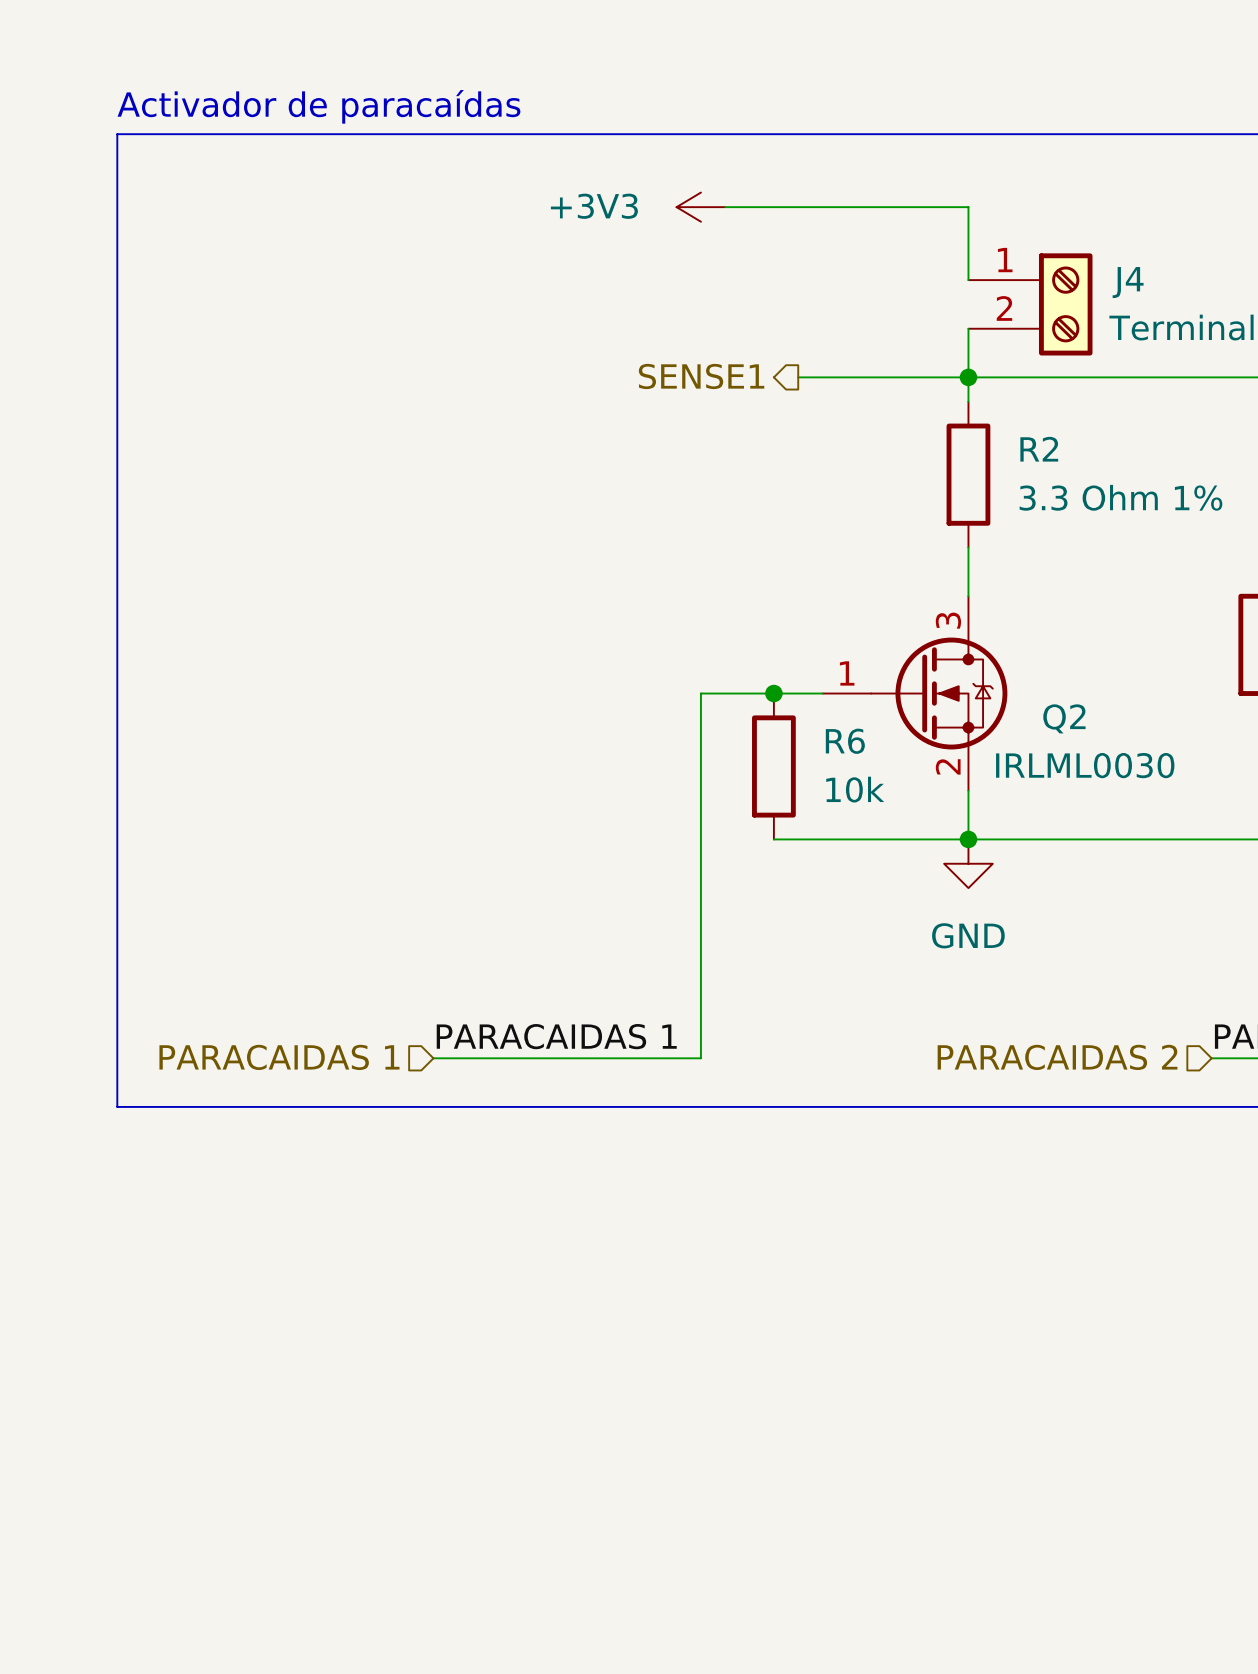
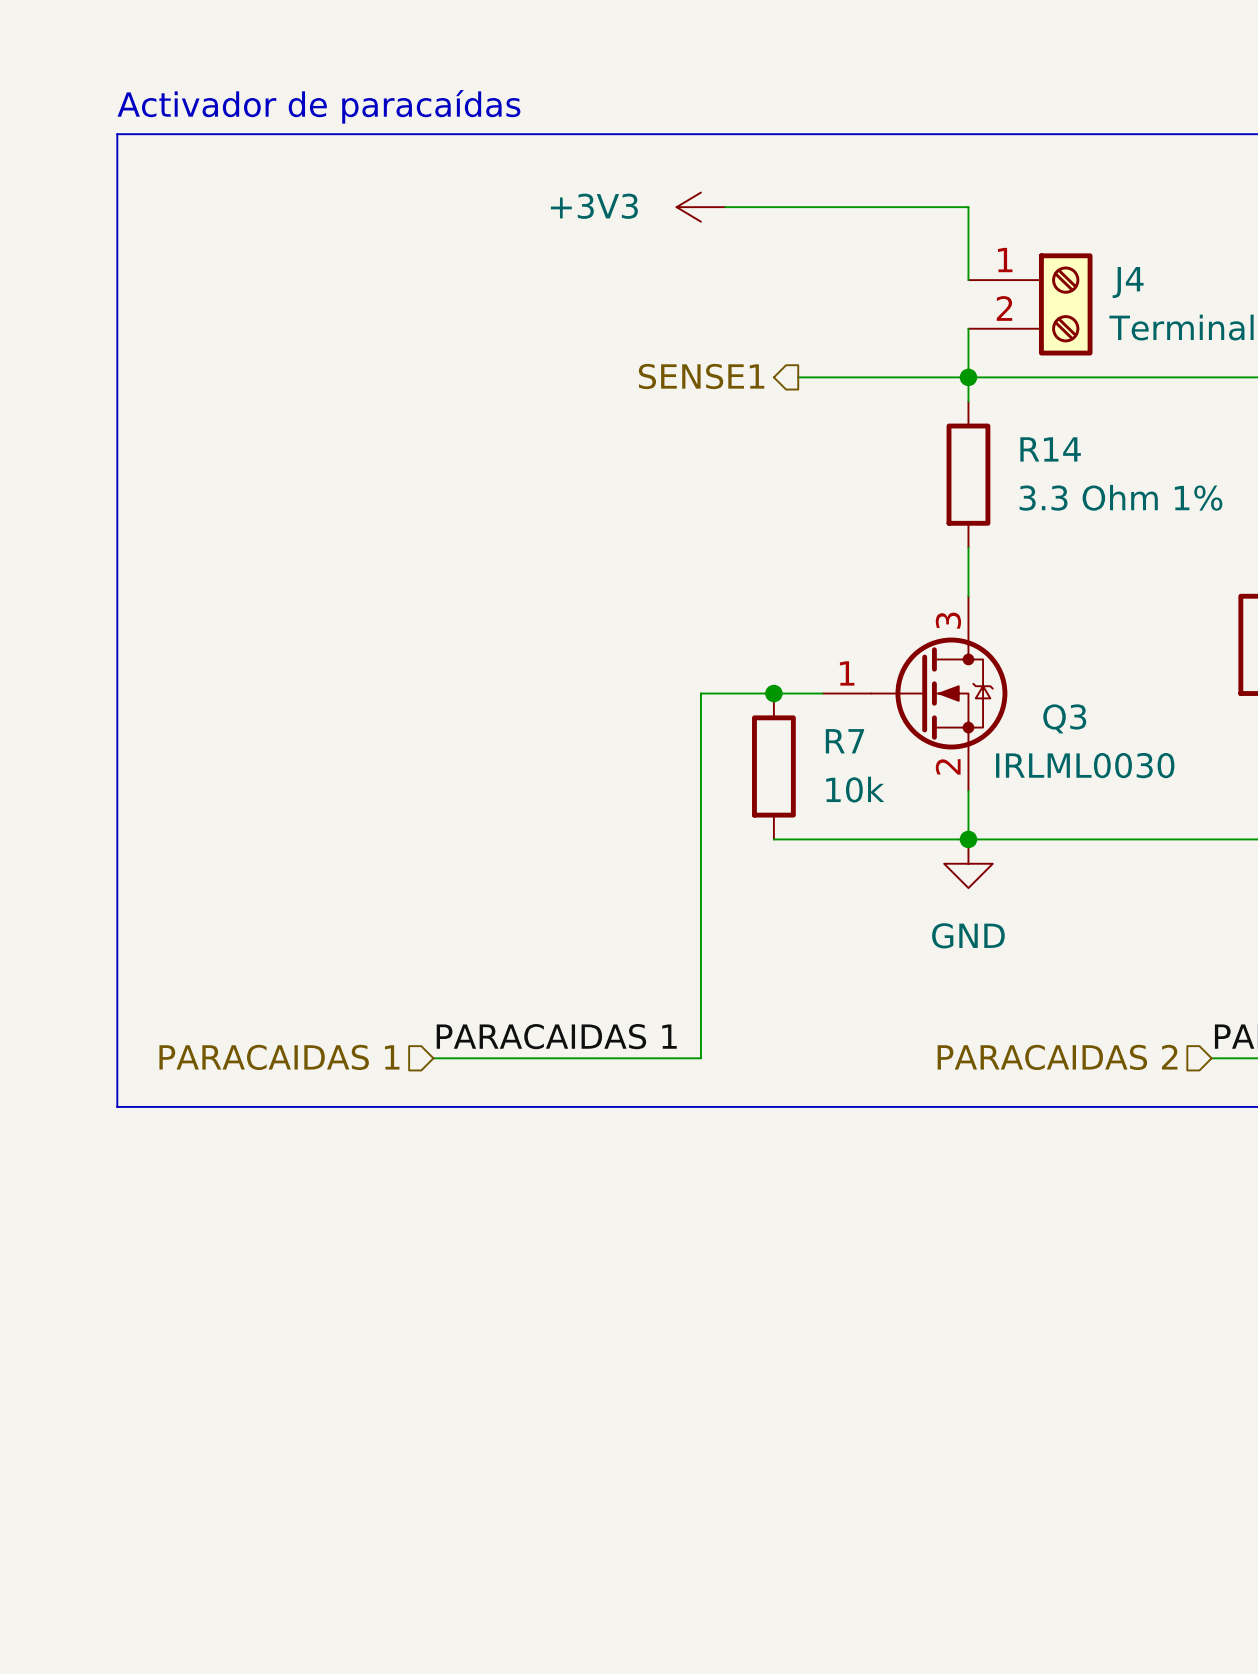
R2 name: R2 (1039, 449) -> R14 (1050, 449)
Q2 name: Q2 (1064, 718) -> Q3 (1064, 718)
R6 name: R6 (845, 741) -> R7 (844, 741)

